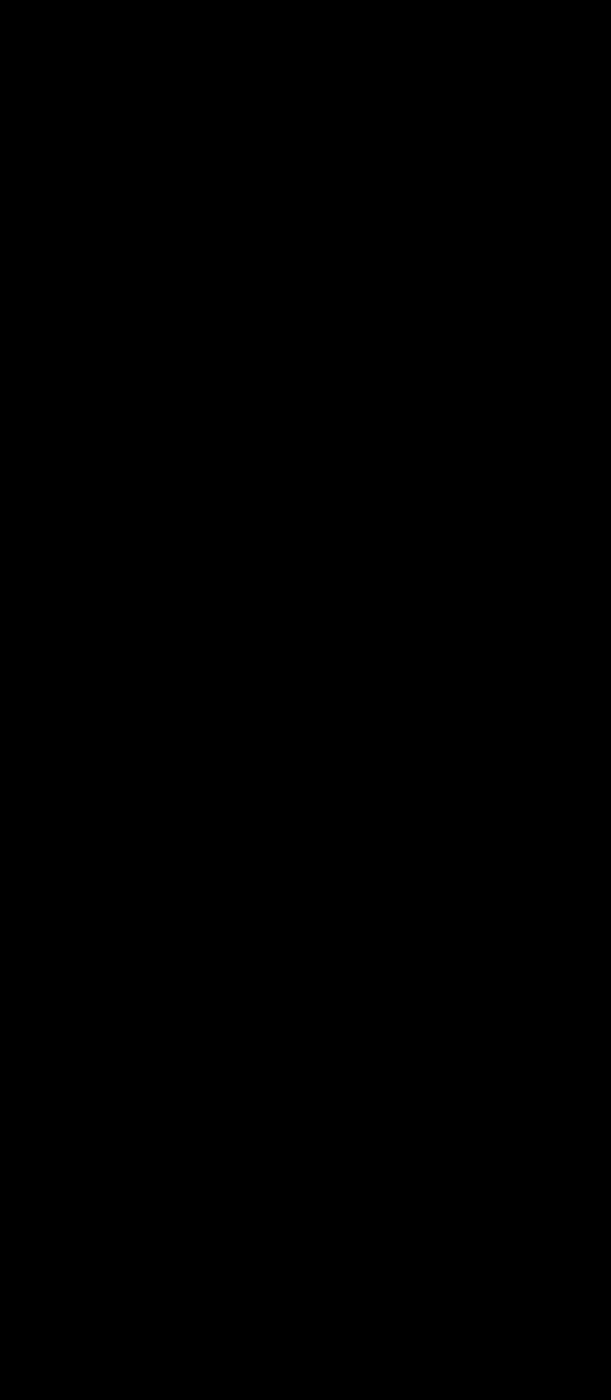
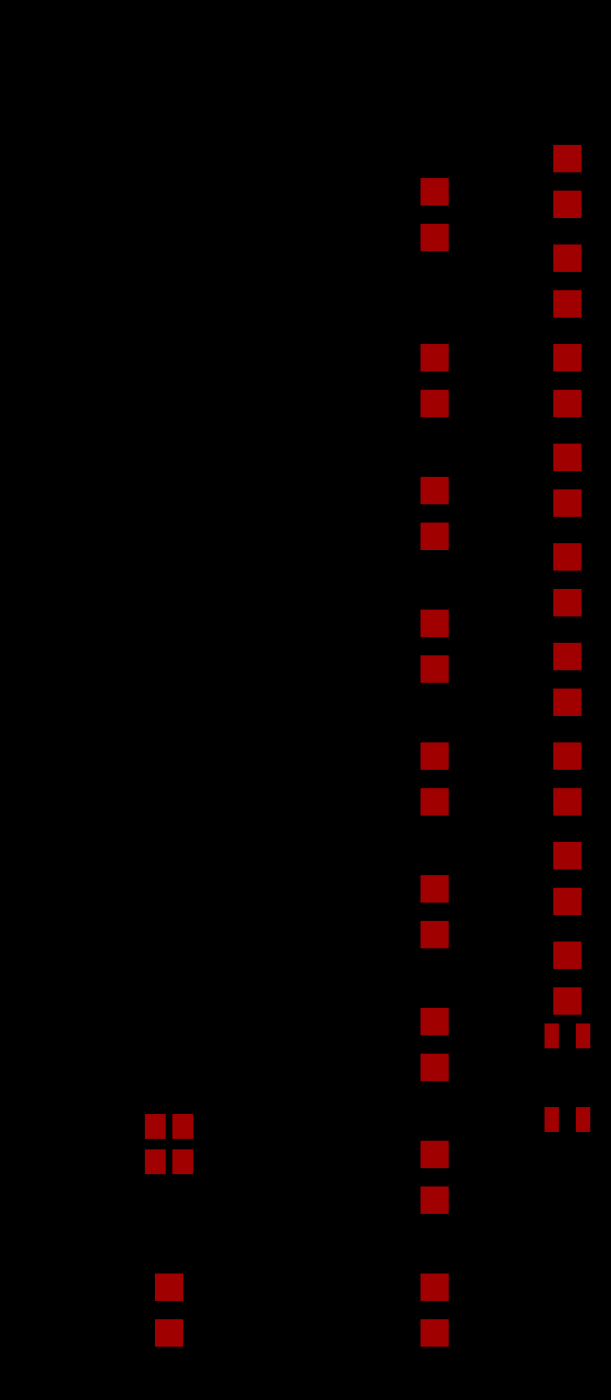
part: none -> (567, 181)
part: none -> (434, 214)
part: none -> (567, 281)
part: none -> (434, 380)
part: none -> (567, 380)
part: none -> (567, 480)
part: none -> (434, 513)
part: none -> (567, 579)
part: none -> (434, 646)
part: none -> (567, 679)
part: none -> (434, 778)
part: none -> (567, 778)
part: none -> (567, 878)
part: none -> (434, 911)
part: none -> (567, 978)
part: none -> (434, 1044)
part: none -> (567, 1077)
part: none -> (169, 1144)
part: none -> (434, 1177)
part: none -> (169, 1310)
part: none -> (434, 1310)

